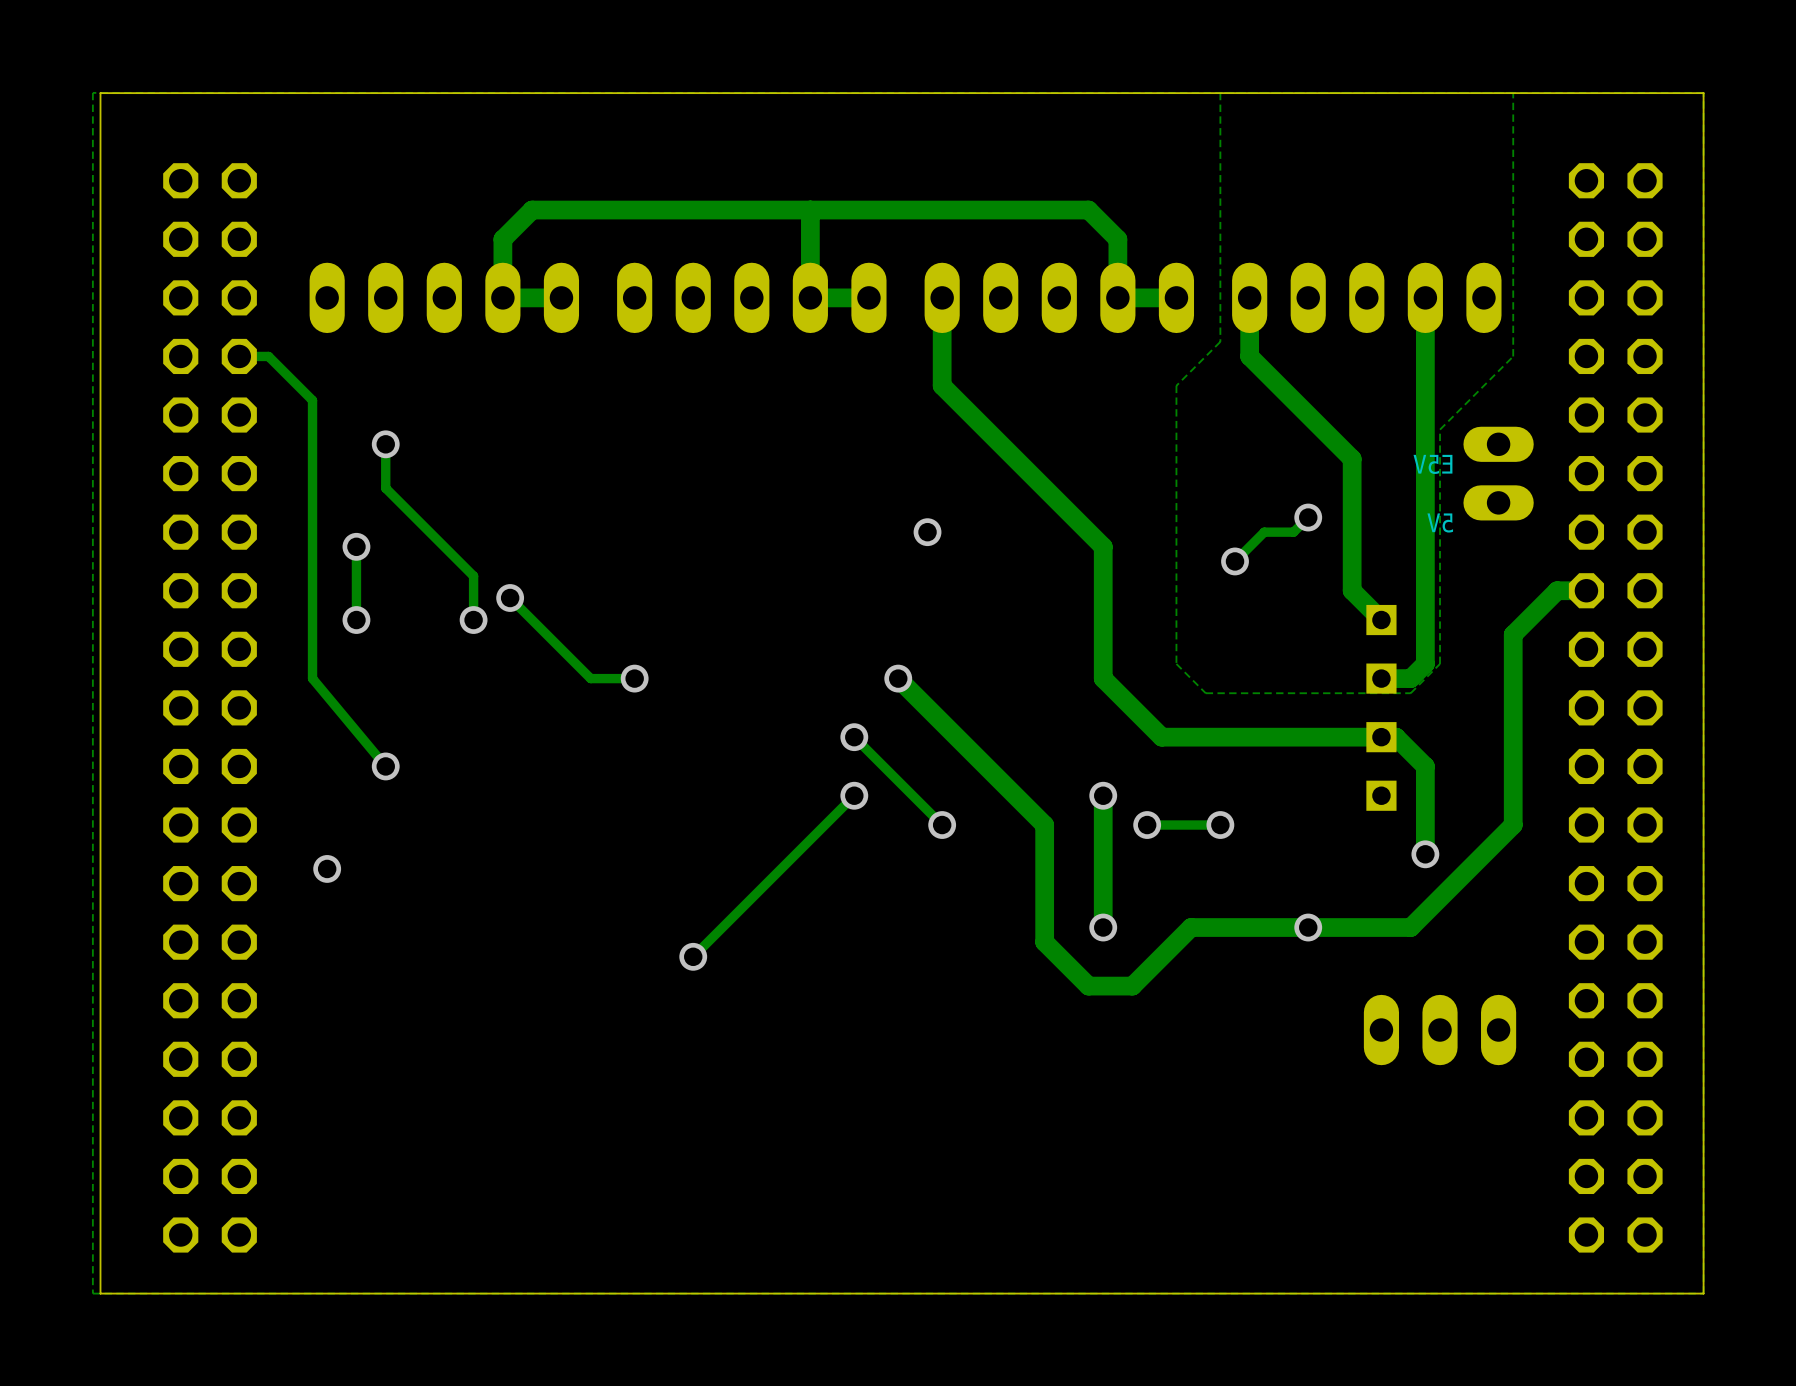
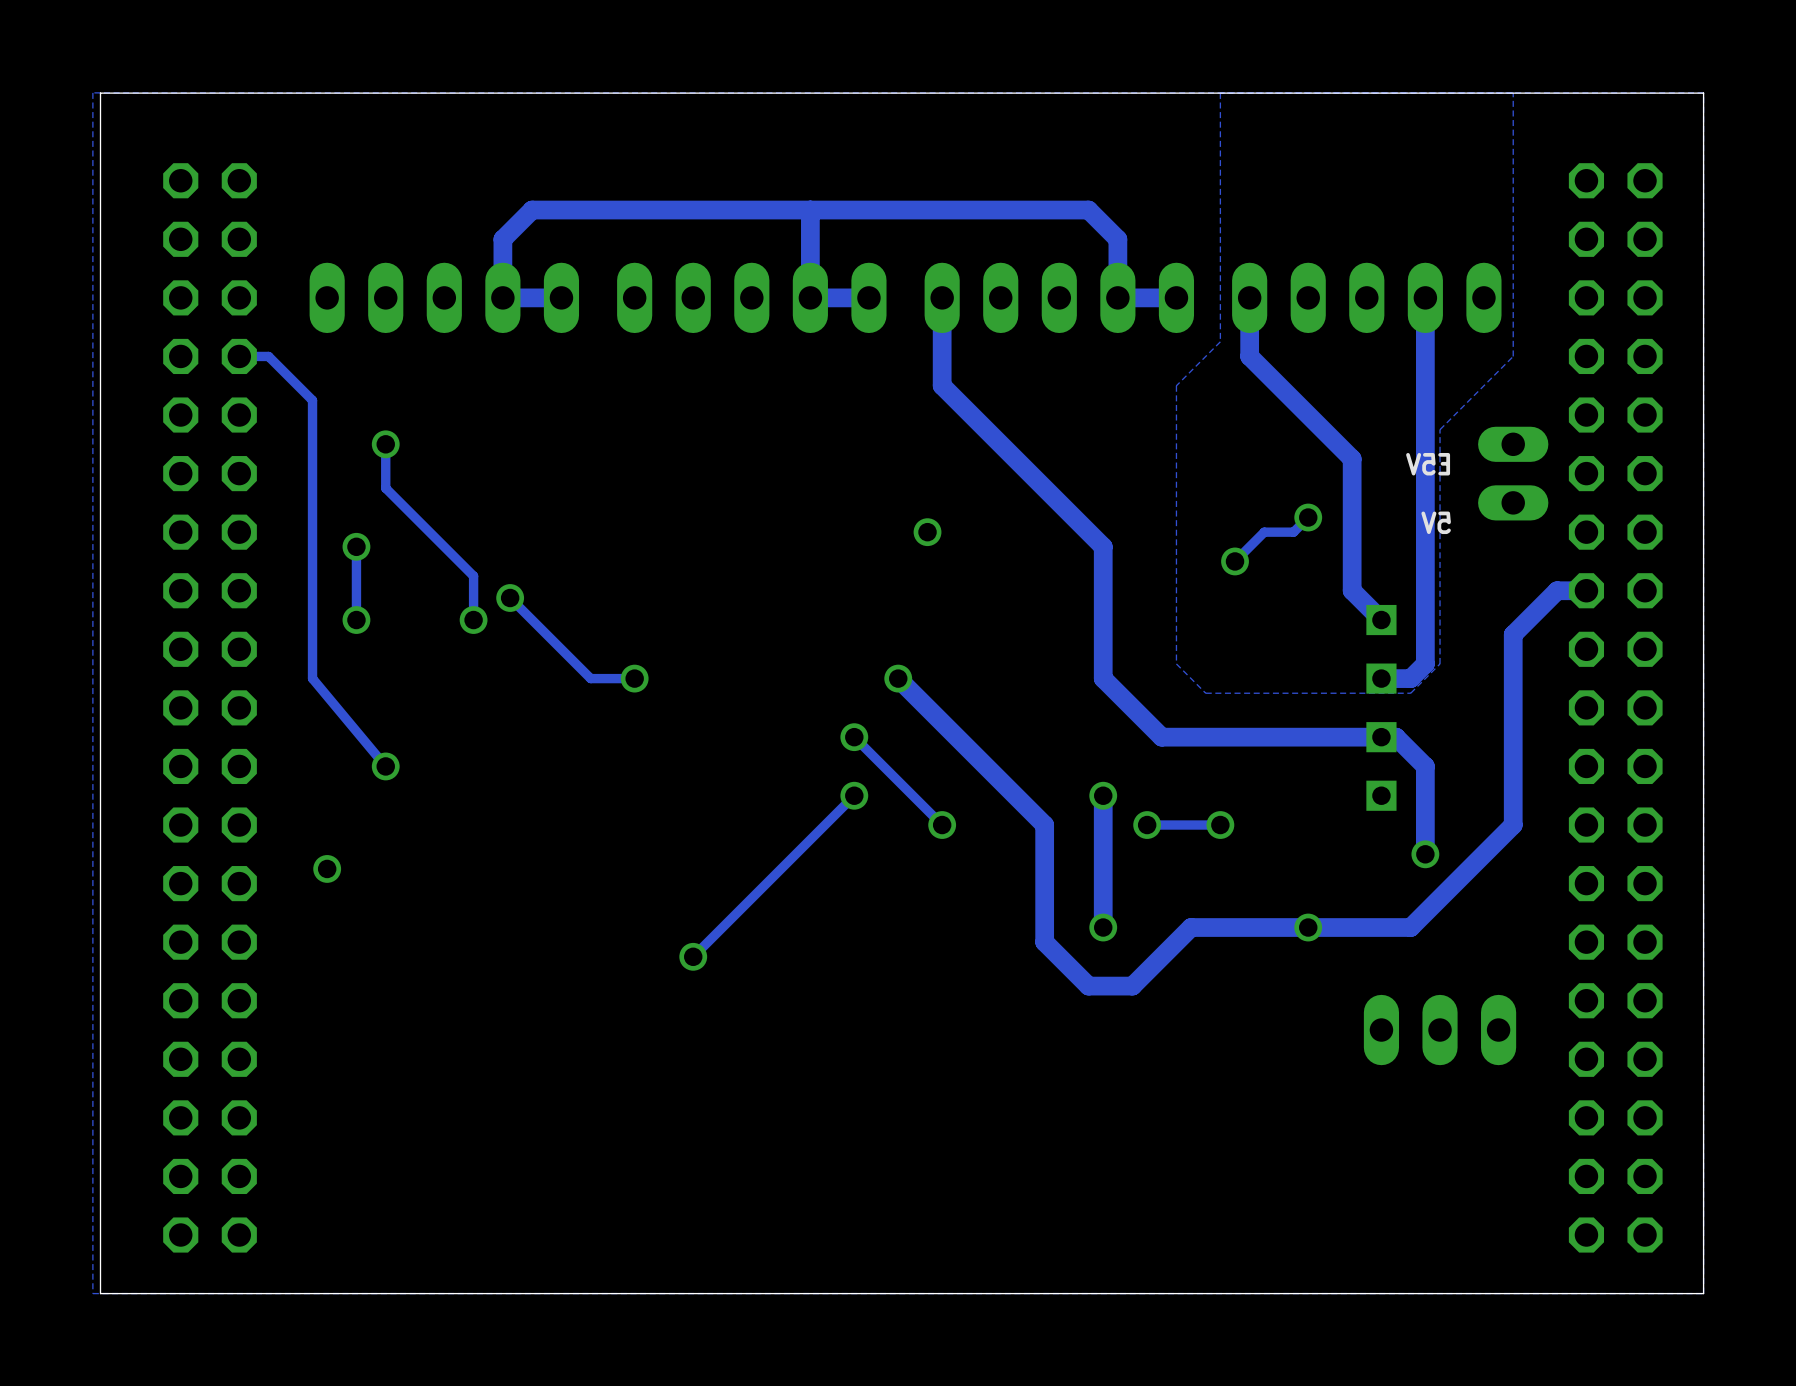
part position: (1498, 473) -> (1513, 473)

